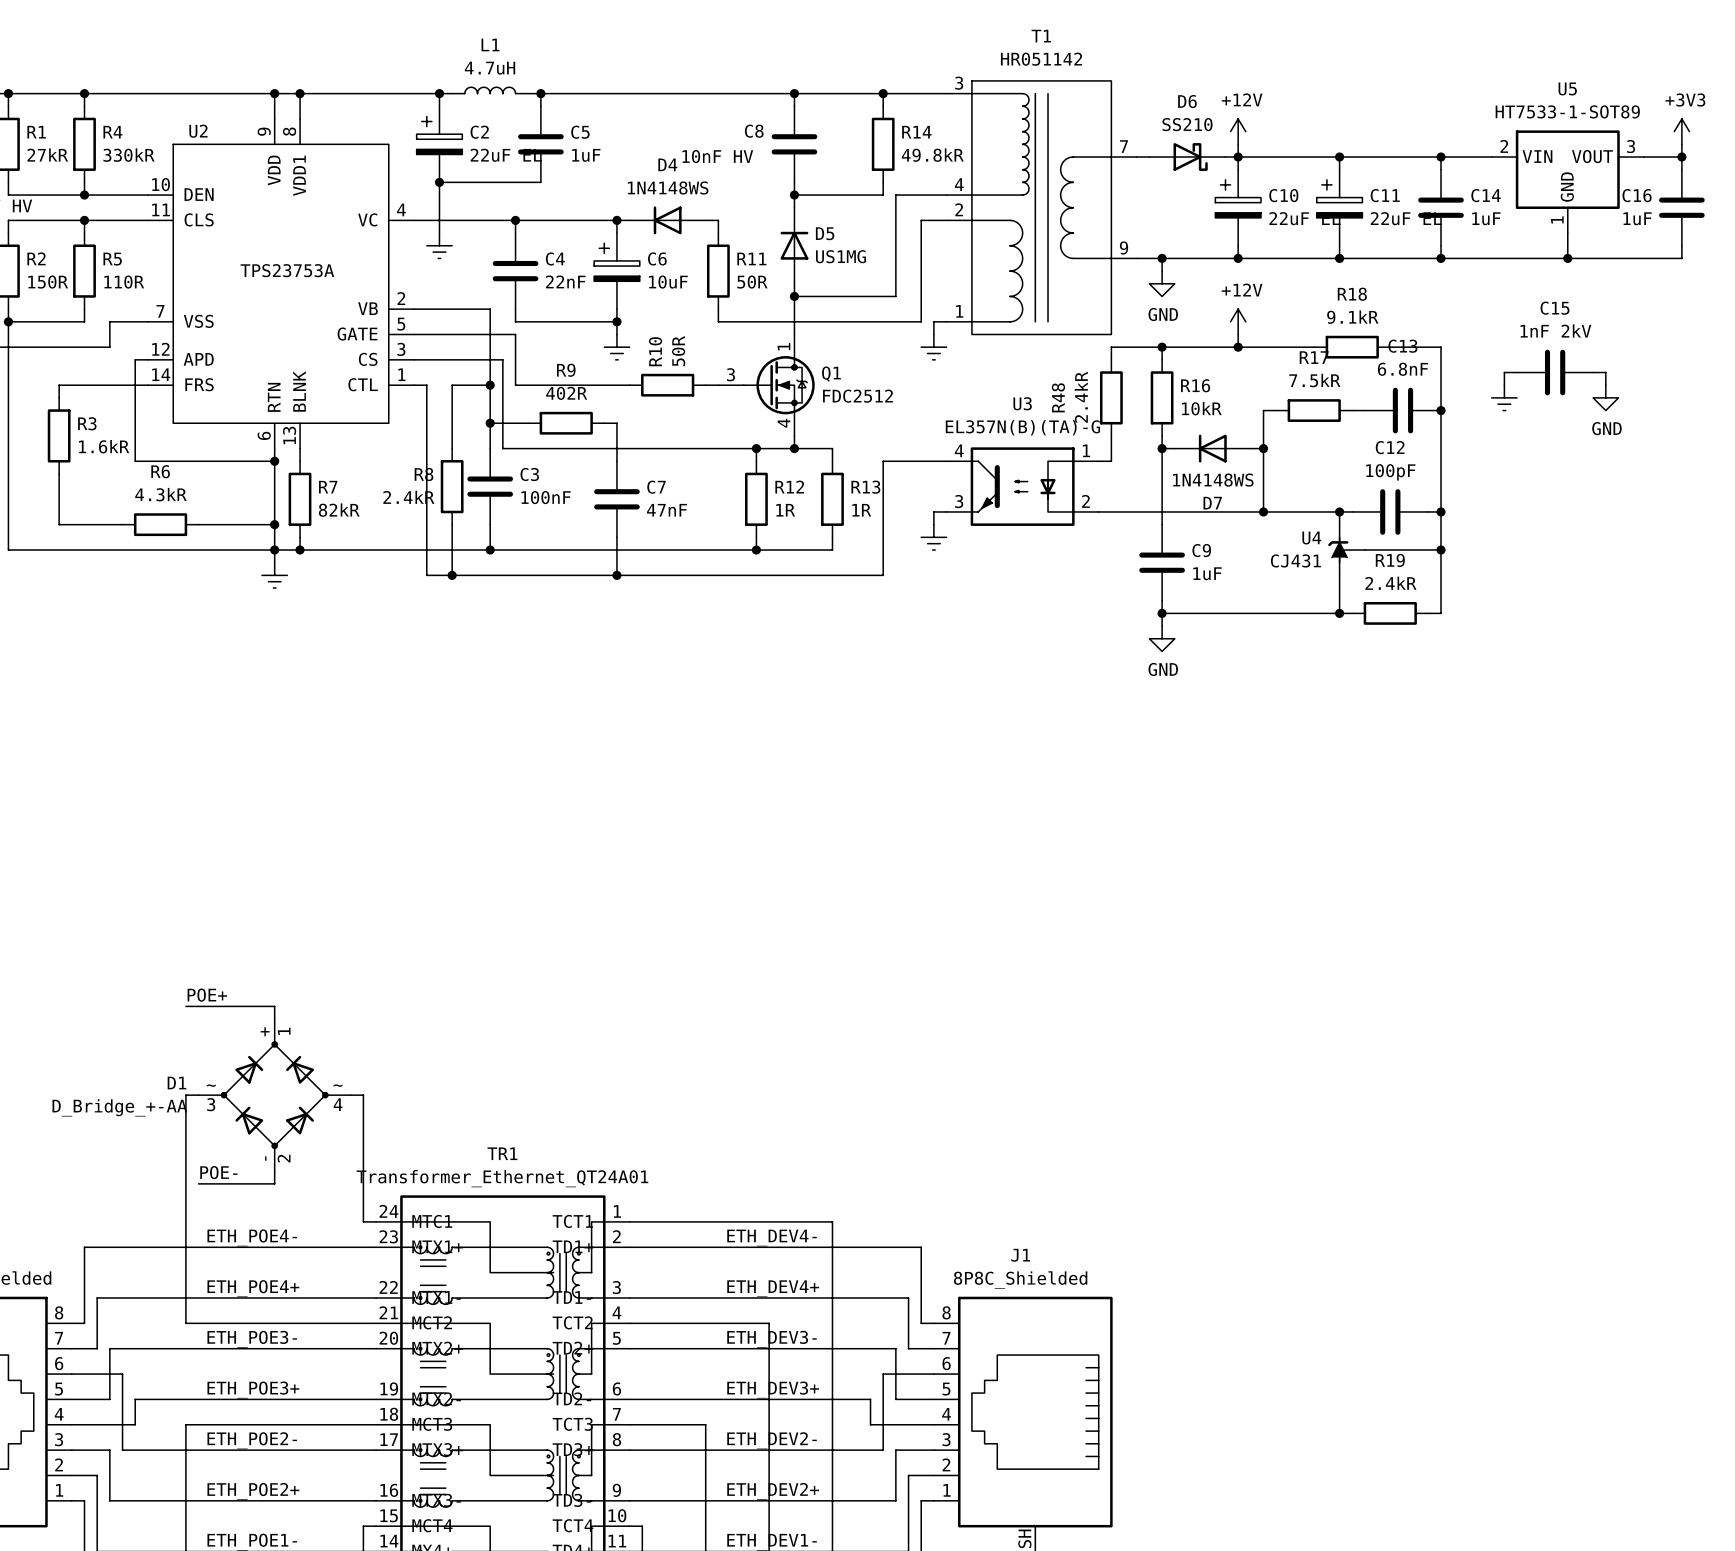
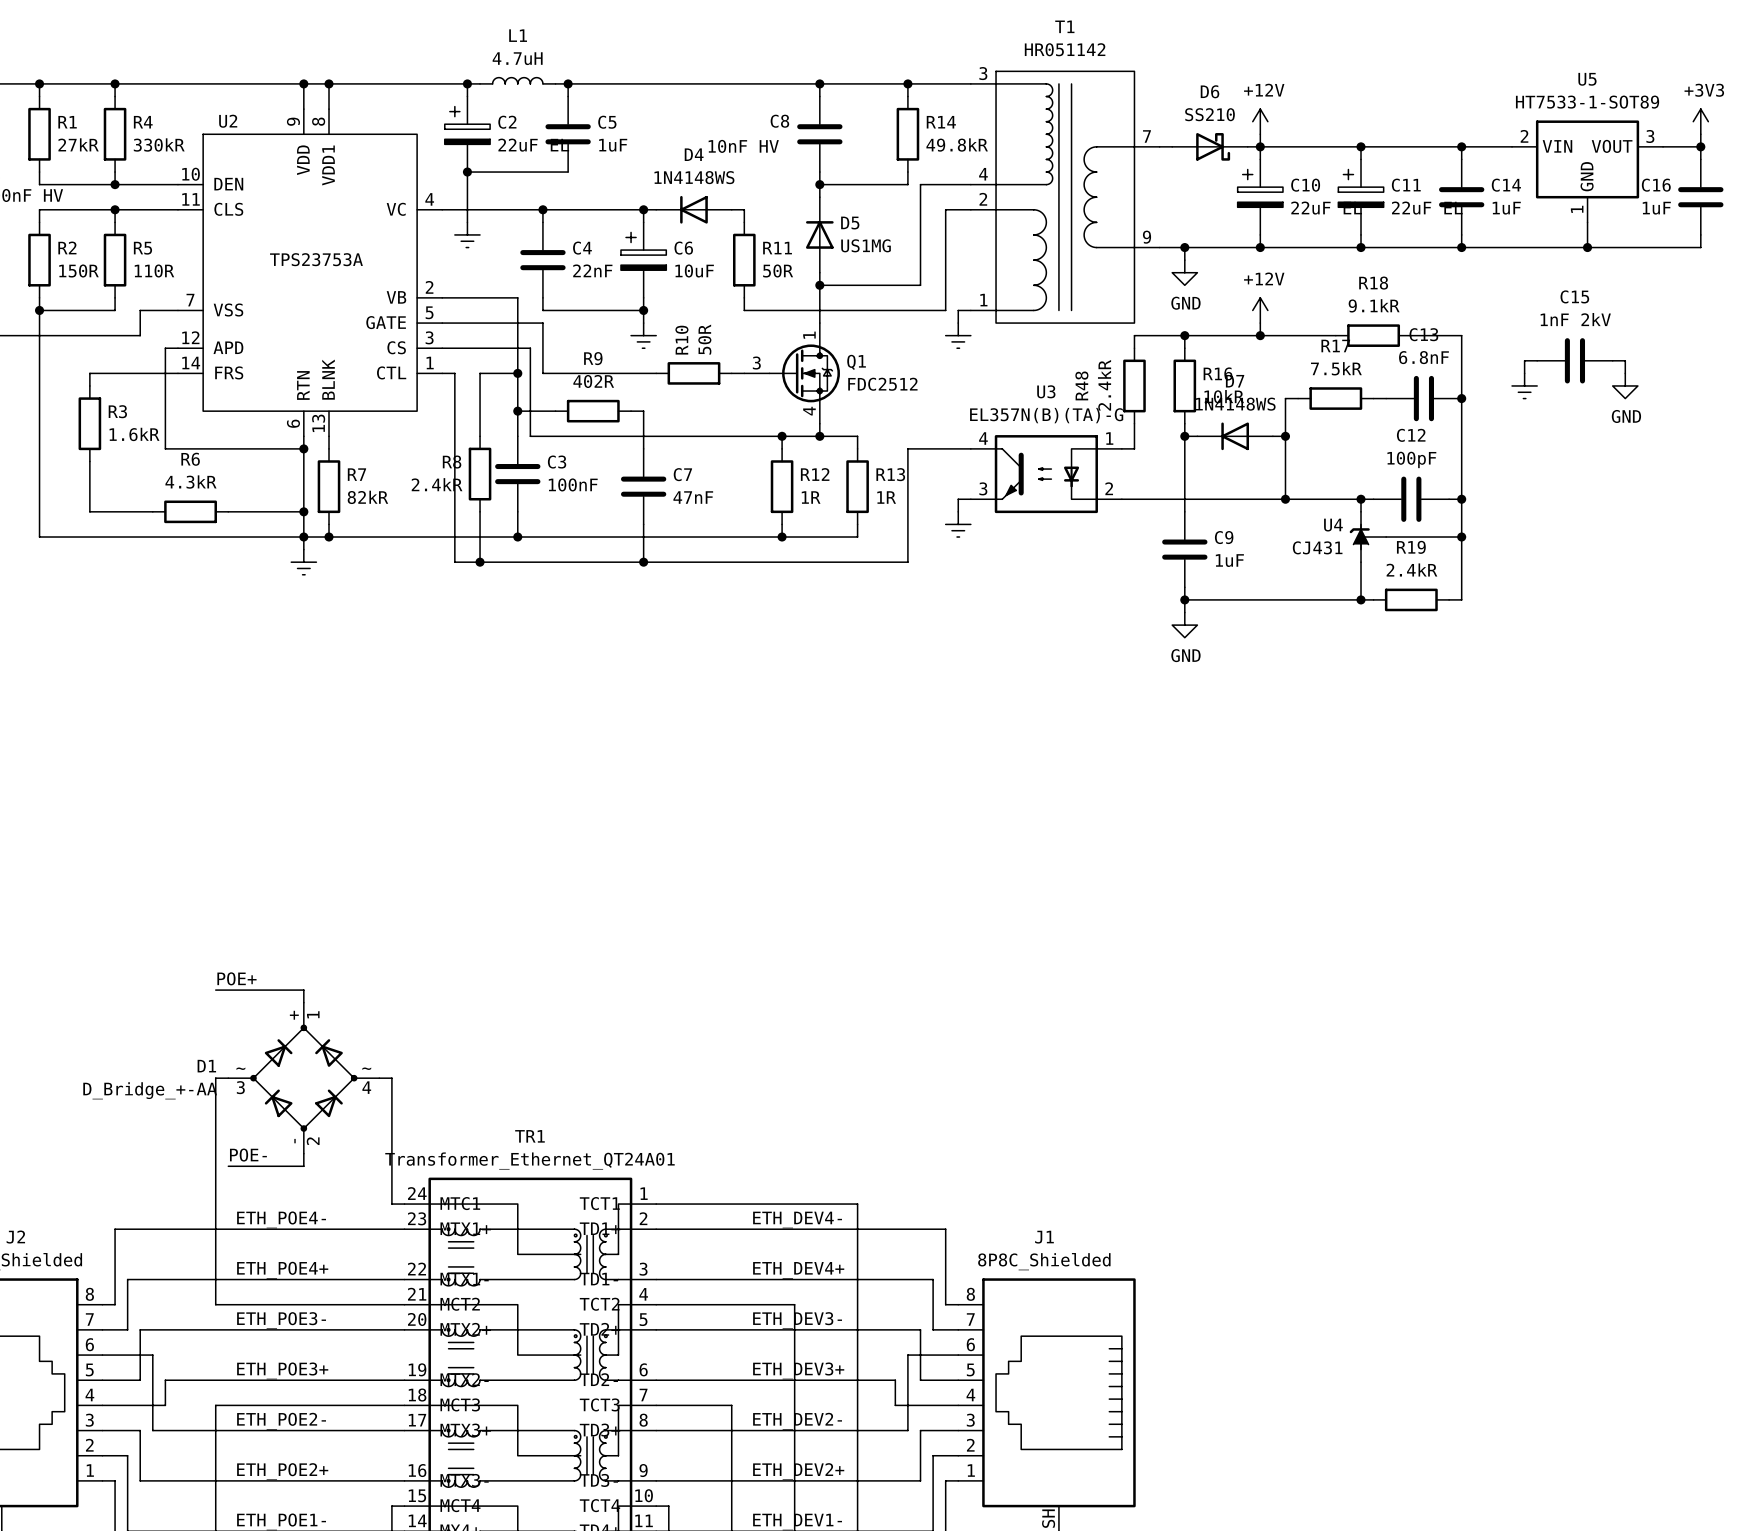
D7 value position: 1N4148WS (1213, 480) -> 1N4148WS (1235, 404)
D7 name position: D7 (1212, 503) -> D7 (1235, 381)

